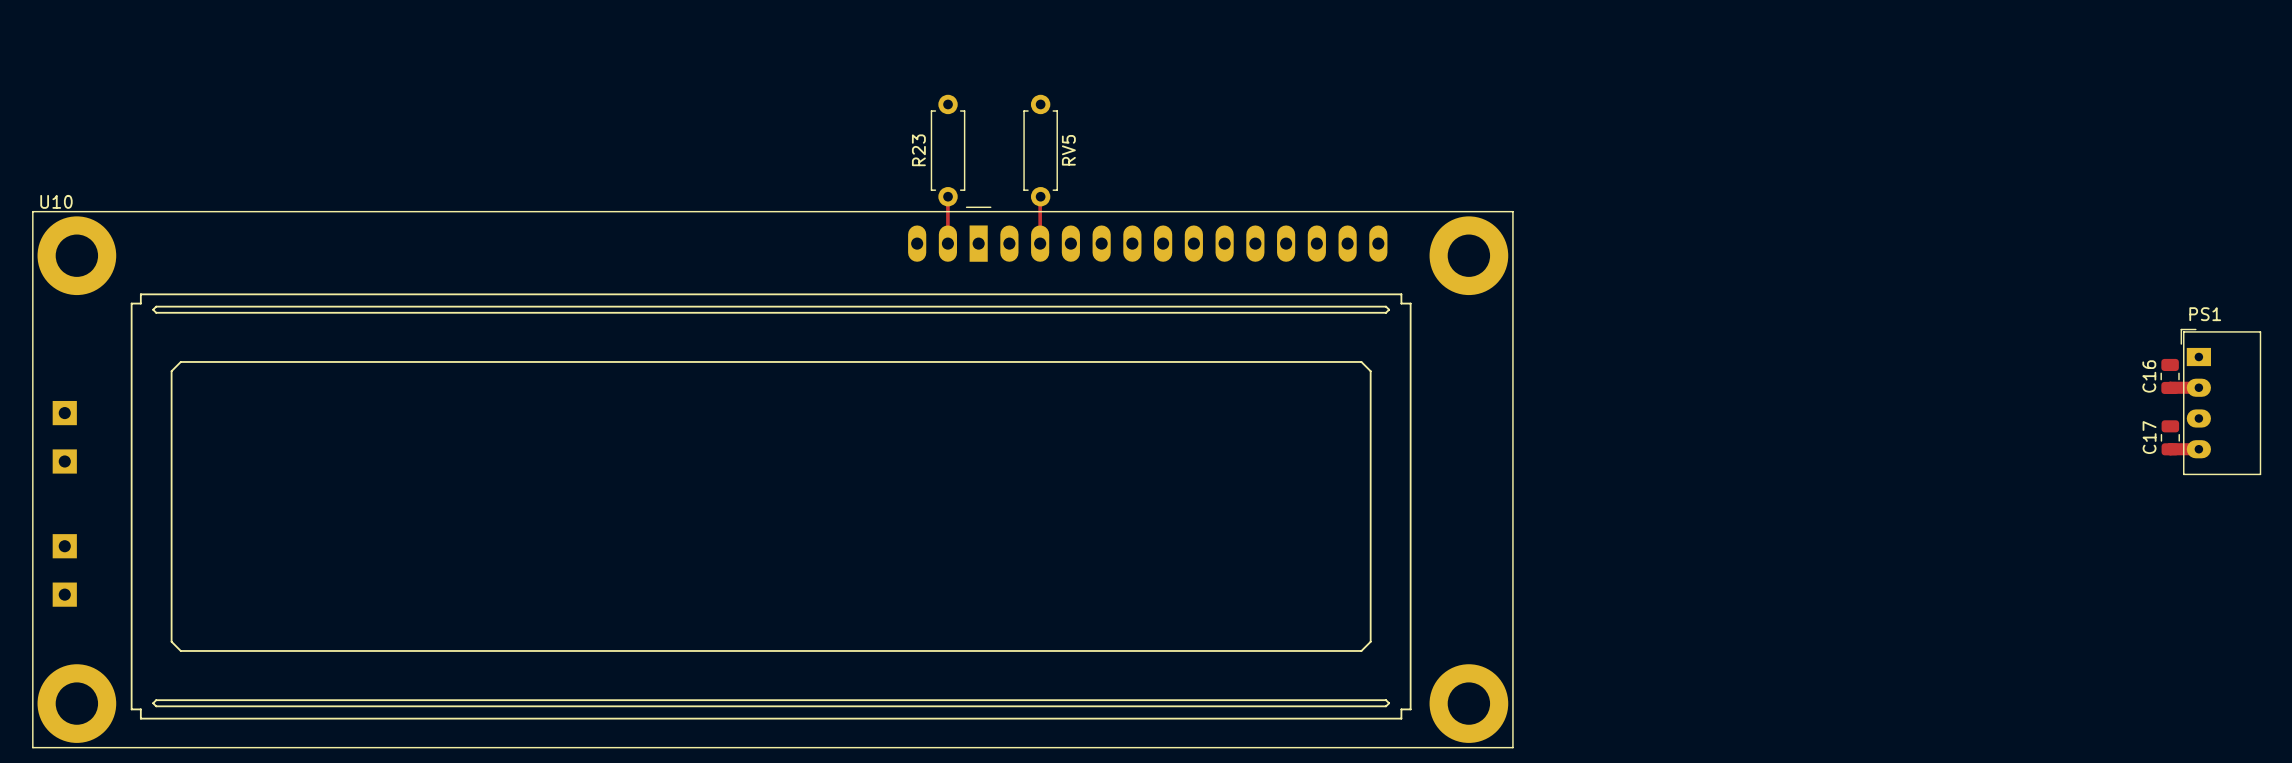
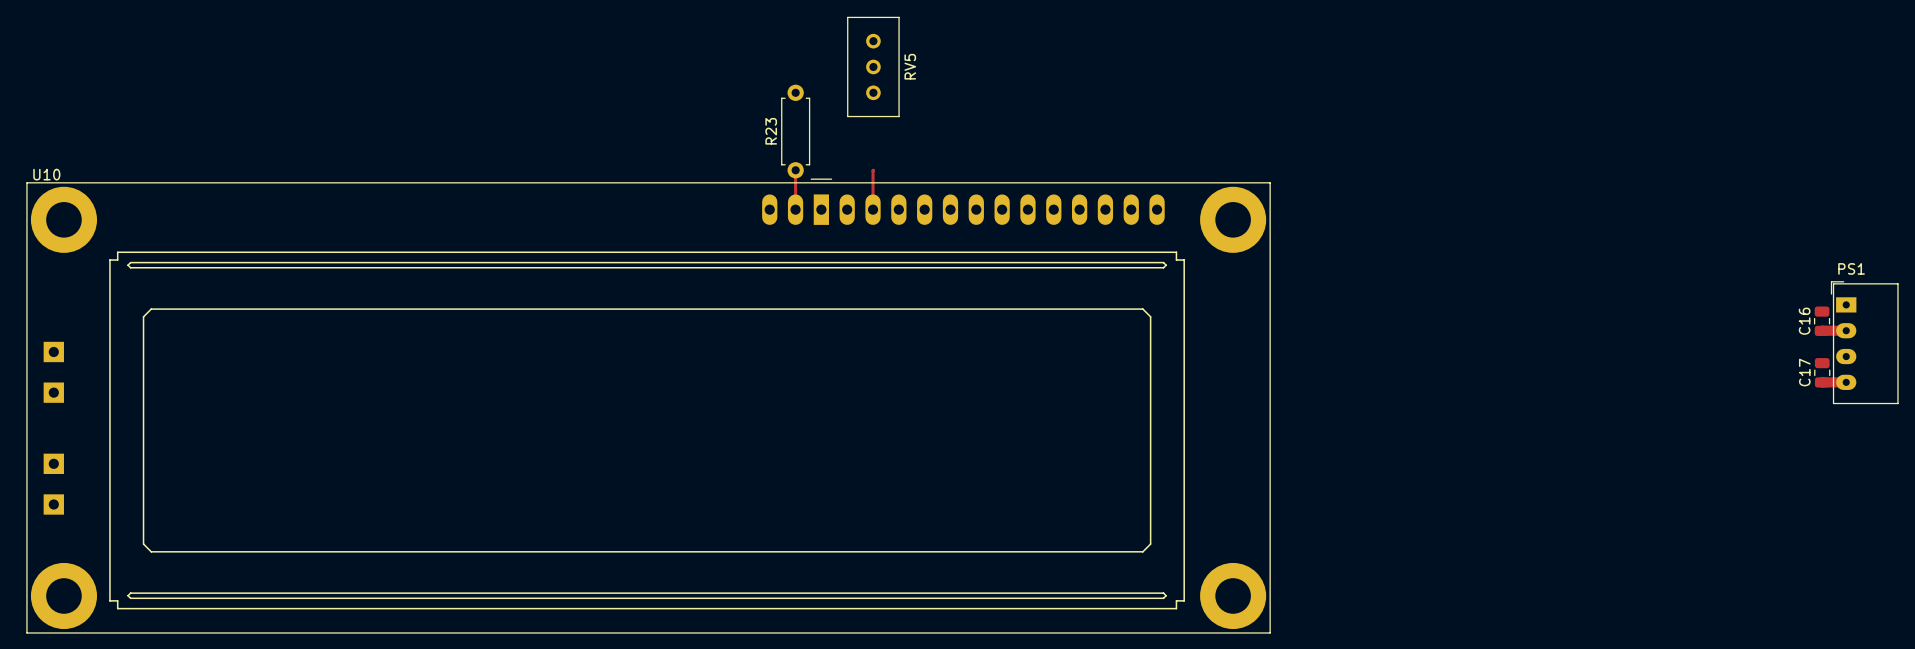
RV5 footprint: [1023, 94, 1058, 207] -> [847, 16, 900, 118]

